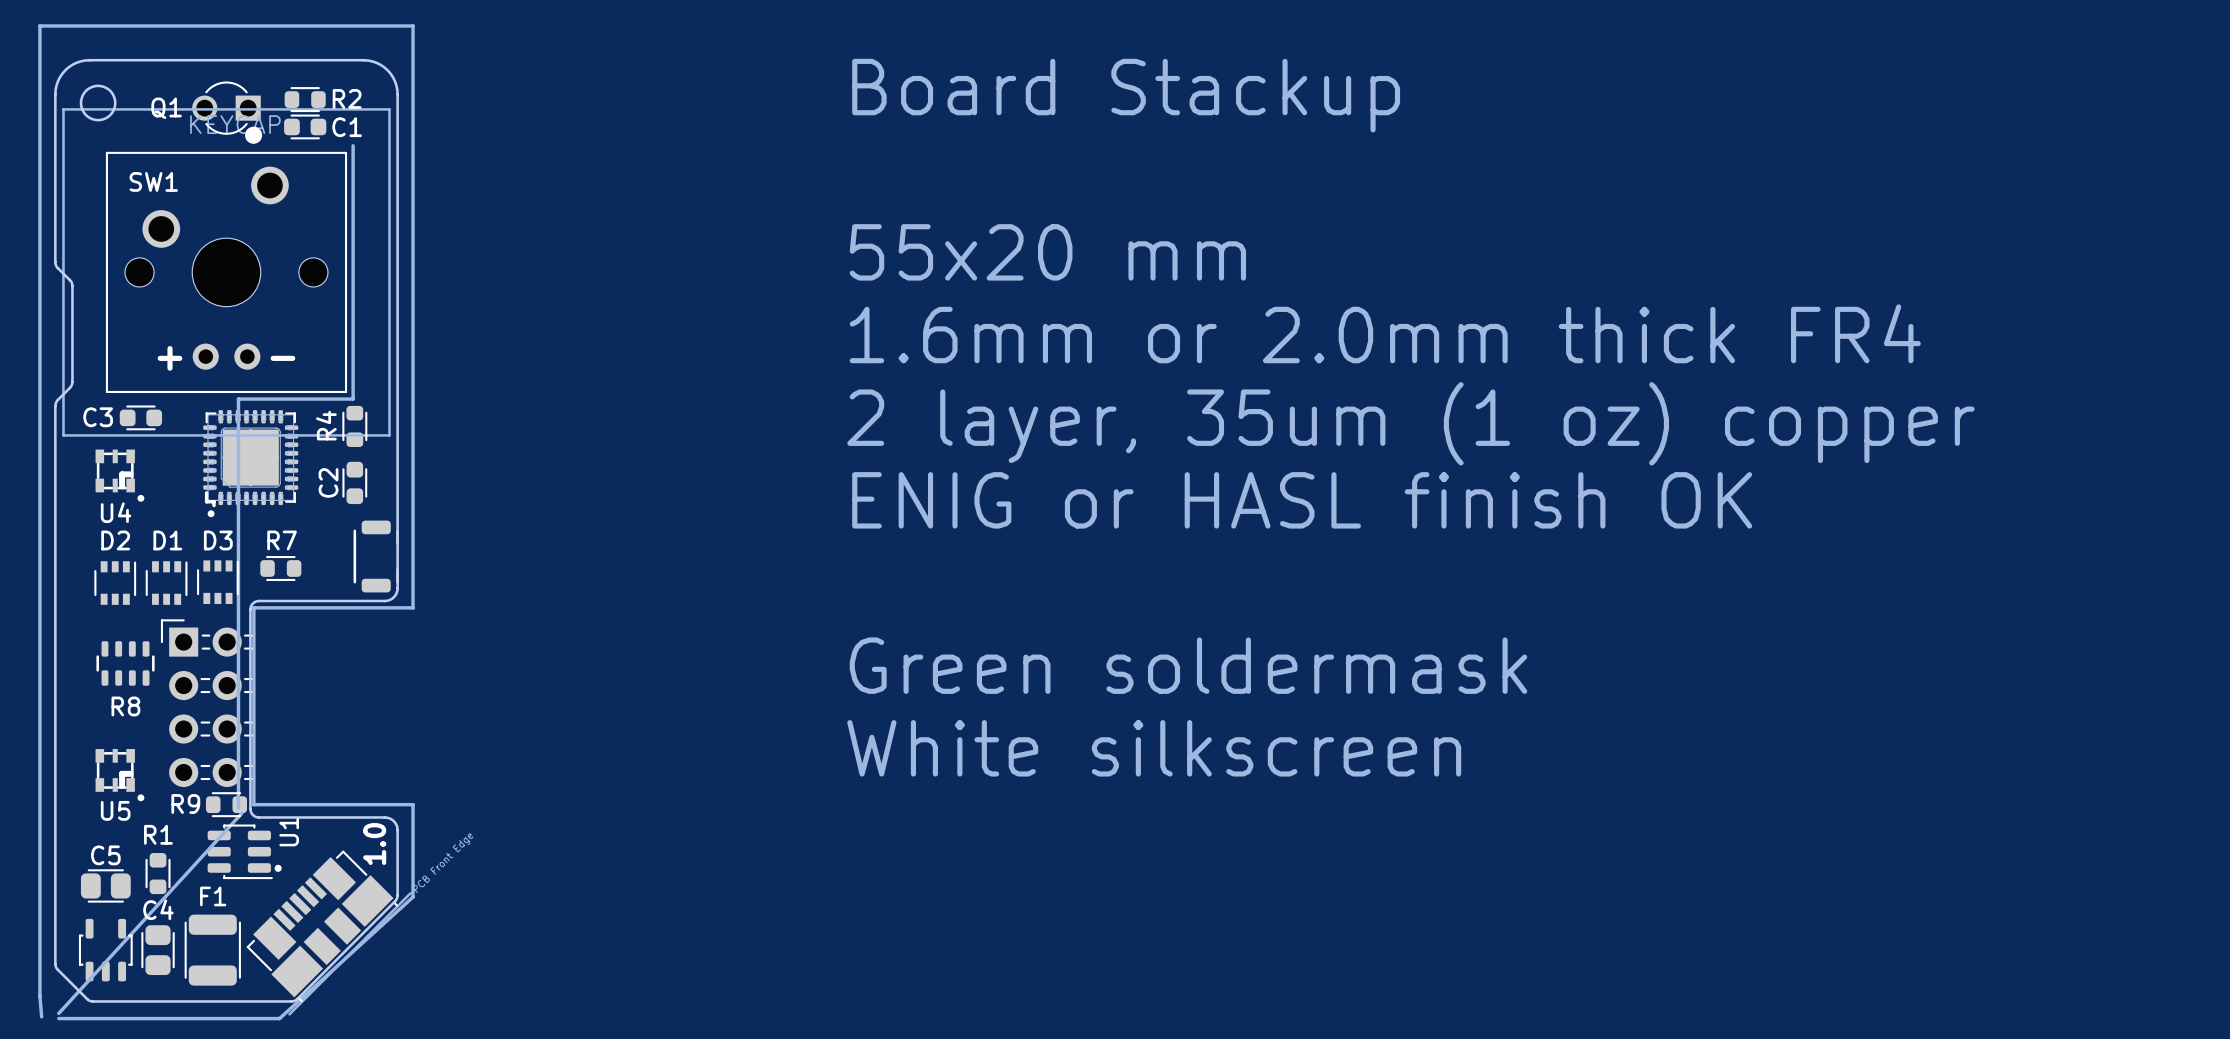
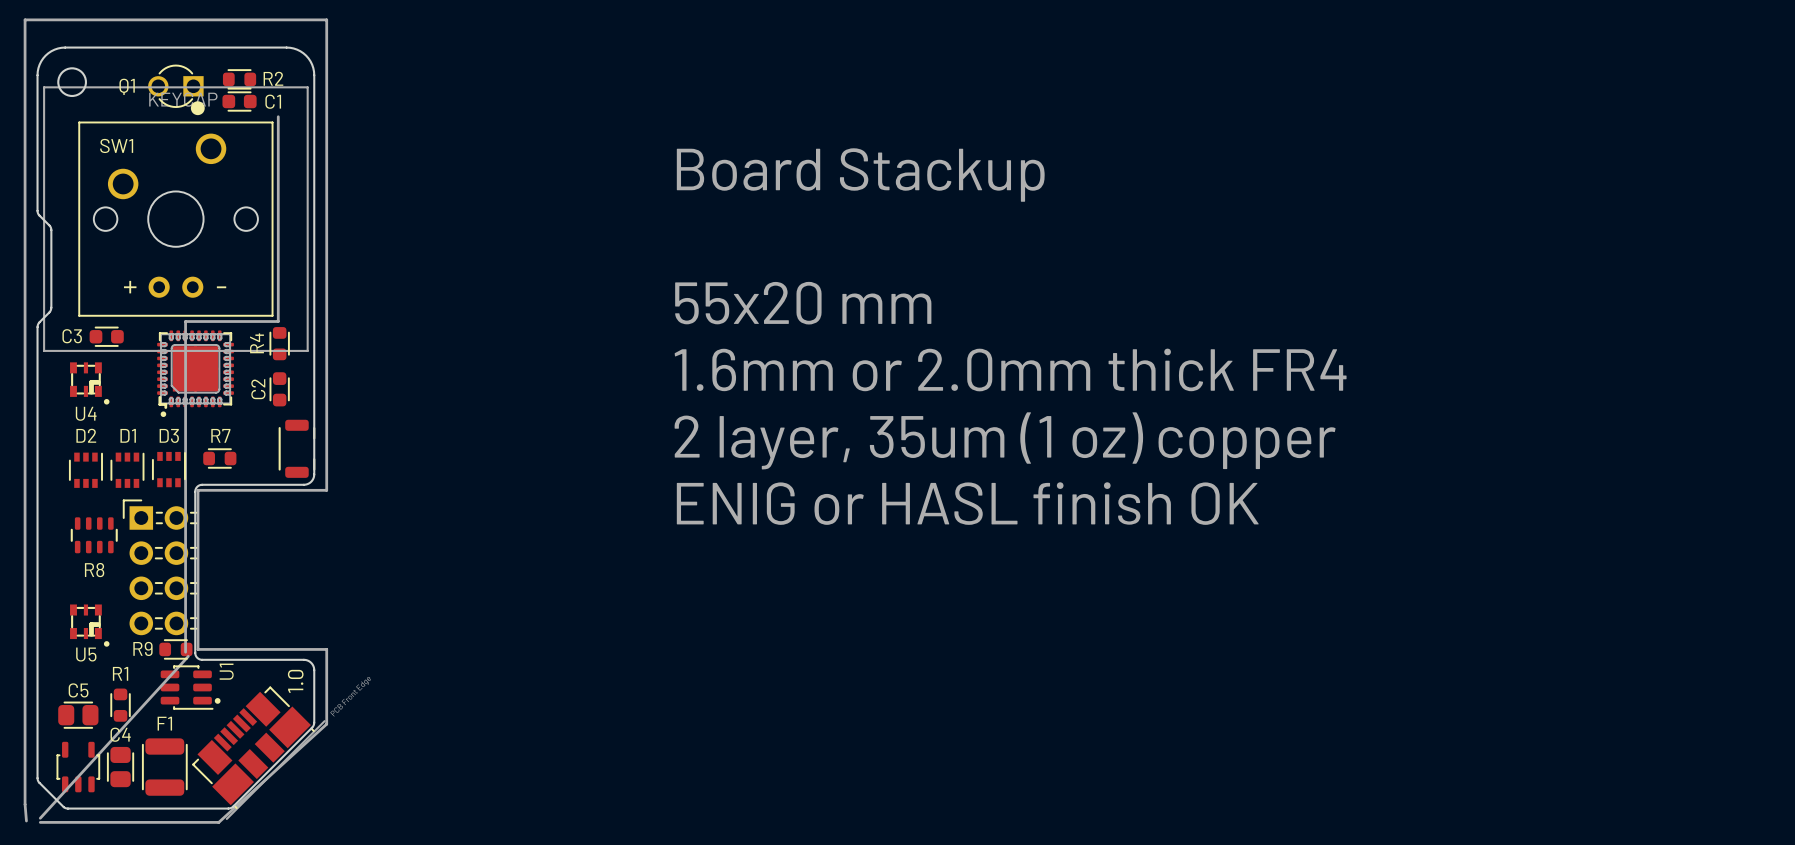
text position: Board Stackup (1126, 95) -> Board Stackup (860, 175)
text position: 55x20 mm (1047, 252) -> 55x20 mm (803, 303)
text position: 1.6mm or 2.0mm thick FR4 (1385, 333) -> 1.6mm or 2.0mm thick FR4 (1010, 369)
text position: 2 layer, 35um (1 oz) copper (1410, 423) -> 2 layer, 35um (1 oz) copper (1005, 440)
text position: ENIG or HASL finish OK (1302, 500) -> ENIG or HASL finish OK (967, 503)
text: Green soldermask (1188, 665) -> none
text: White silkscreen (1154, 748) -> none

